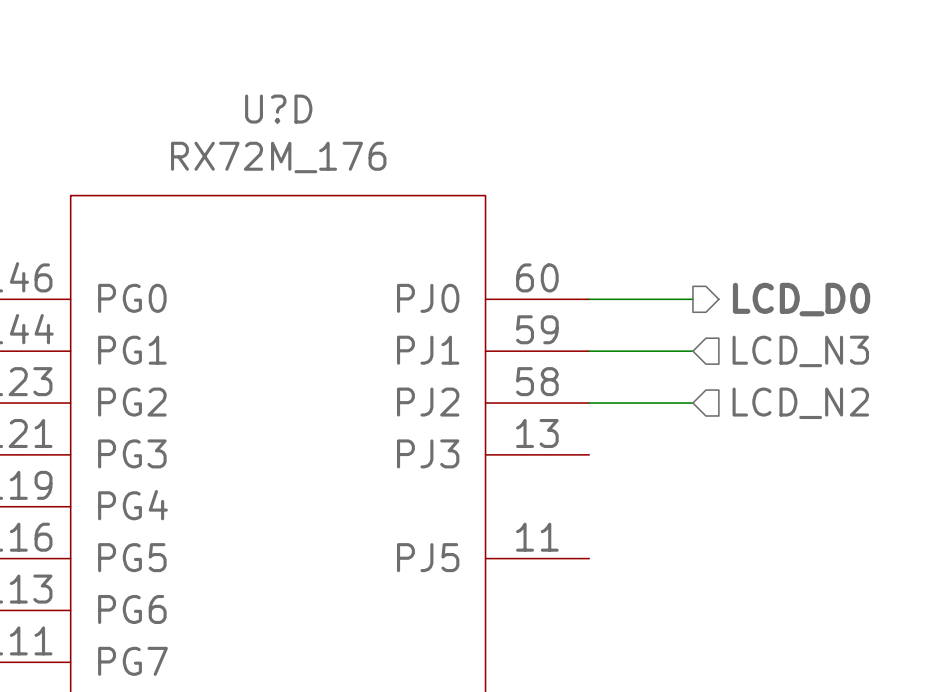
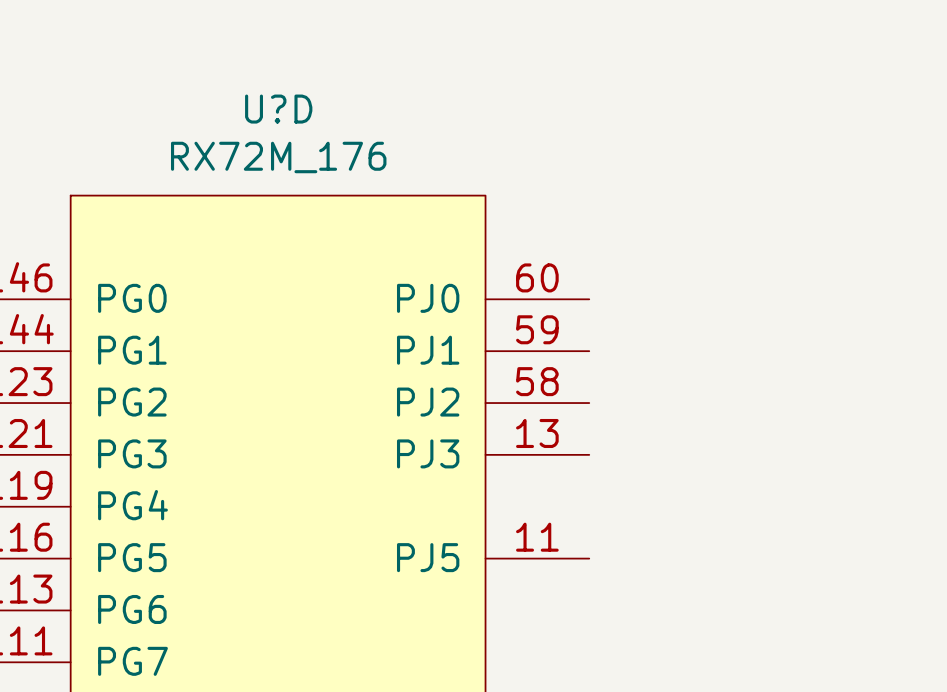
wire: (589, 299) (692, 299) -> none
hierarchical label: LCD_D0 (801, 299) -> none
wire: (589, 351) (692, 351) -> none
hierarchical label: LCD_N3 (800, 351) -> none
wire: (589, 403) (692, 403) -> none
hierarchical label: LCD_N2 (800, 403) -> none

